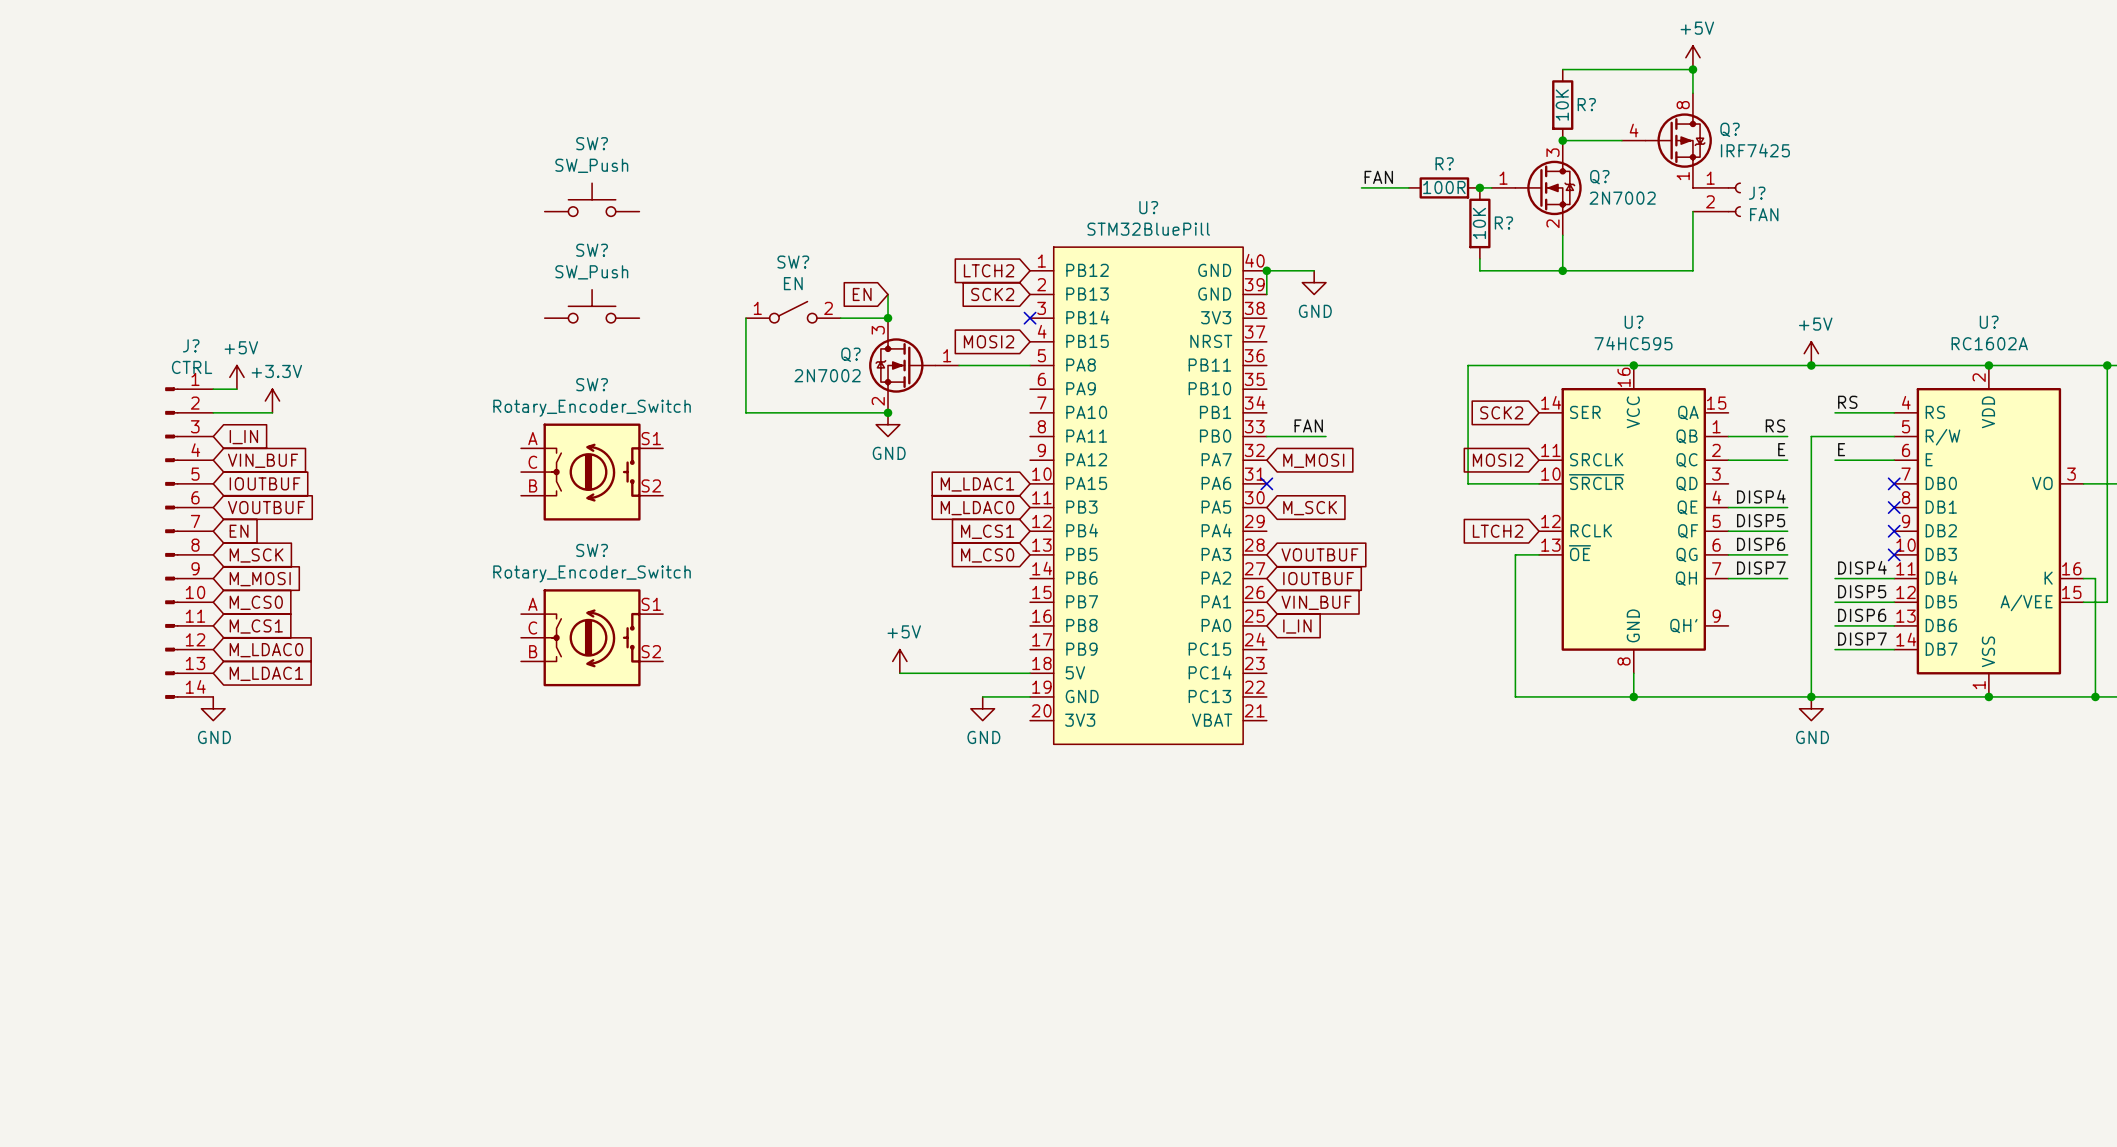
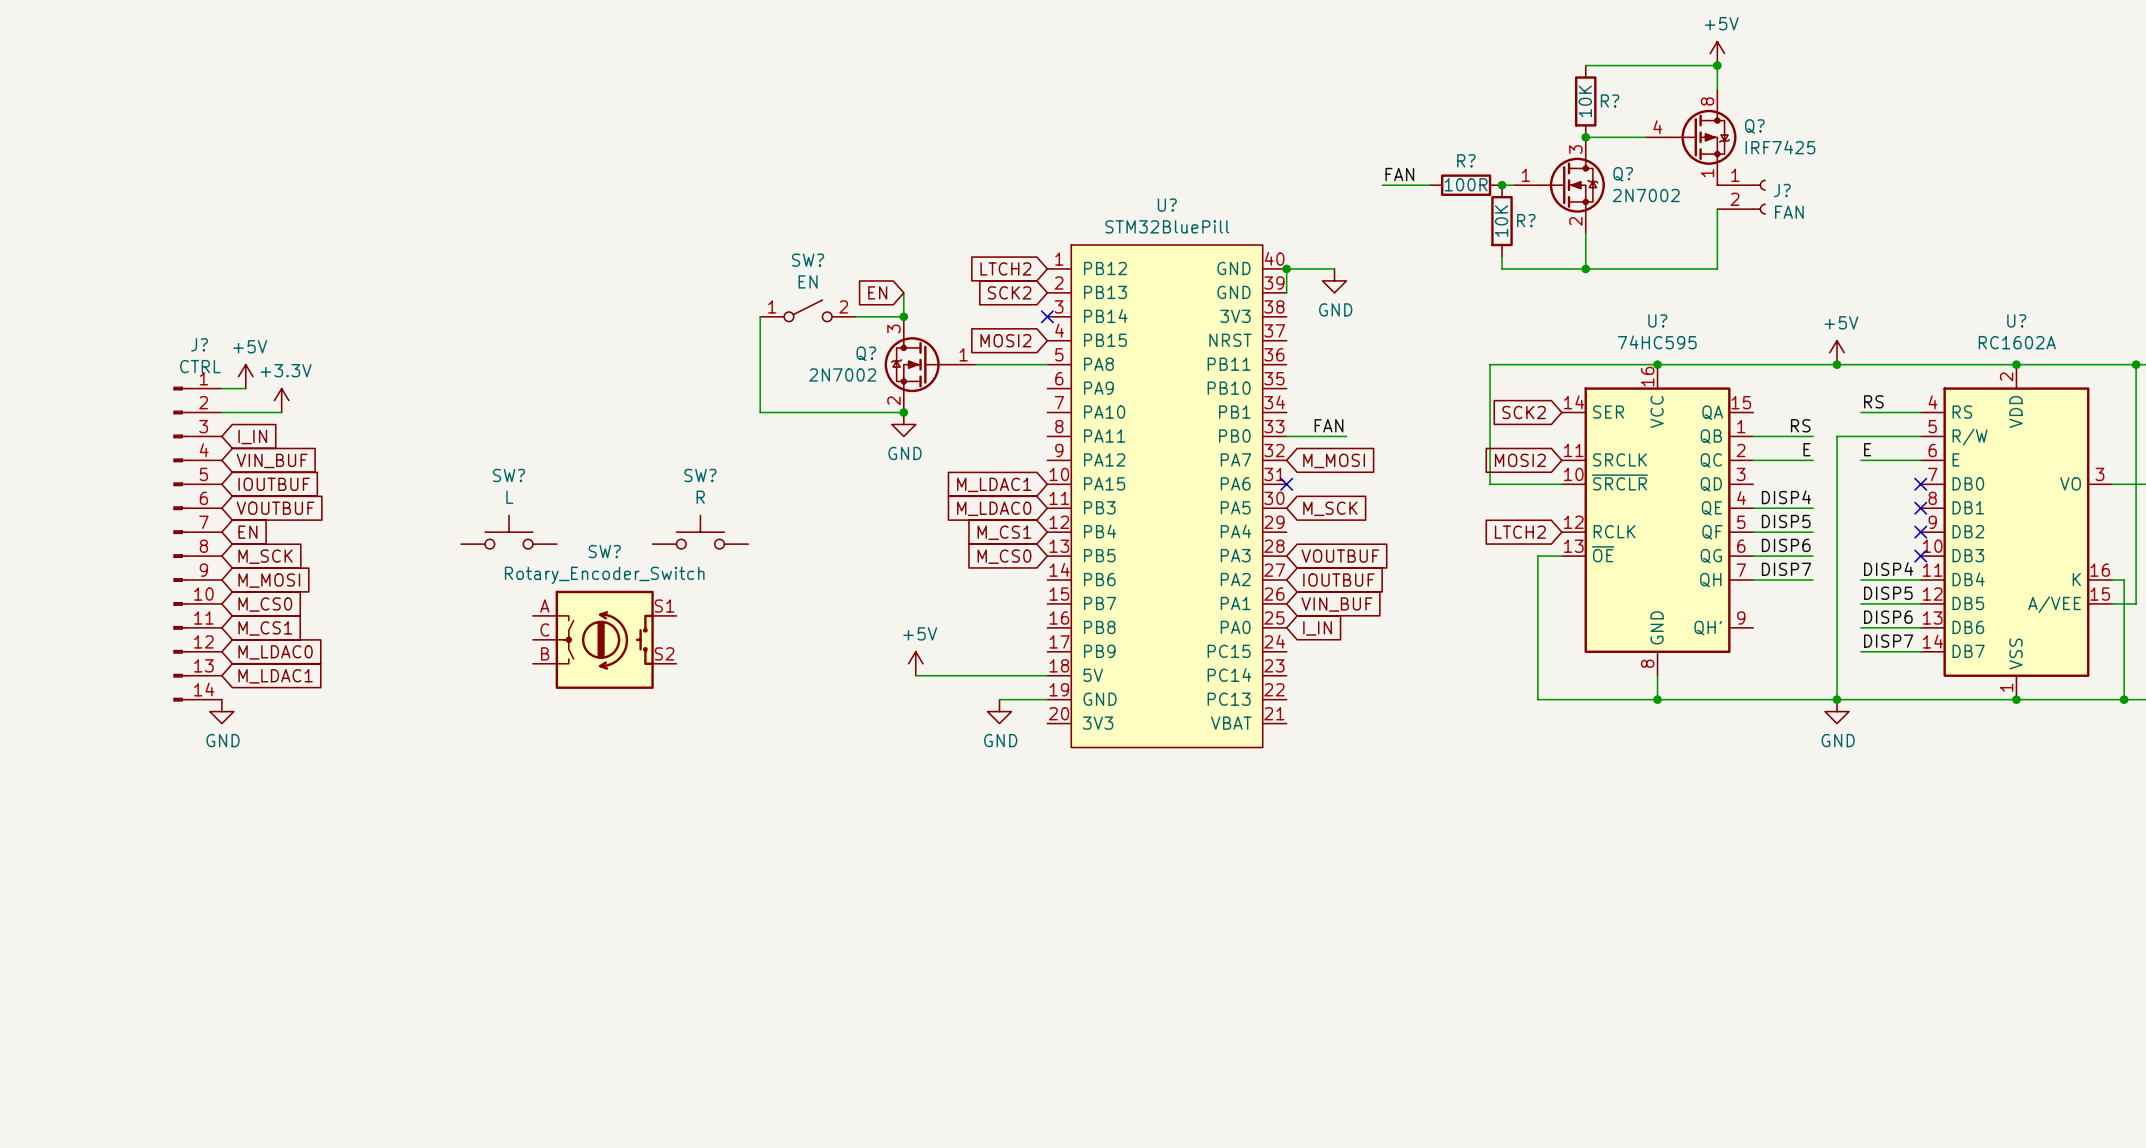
SW?: SW_Push (592, 199) -> none
SW?: SW_Push (592, 306) -> none
SW?: Rotary_Encoder_Switch (592, 472) -> none
SW?: none -> L (508, 532)
SW?: none -> R (700, 532)

